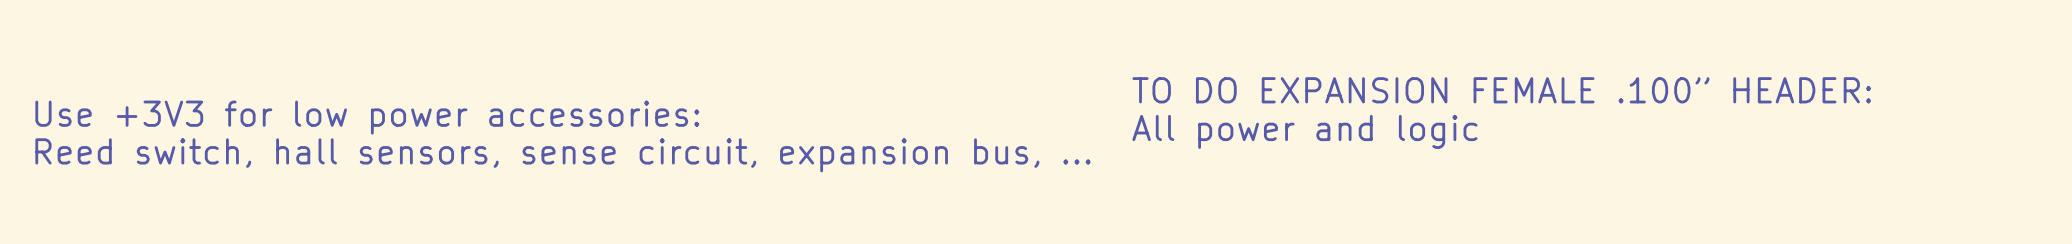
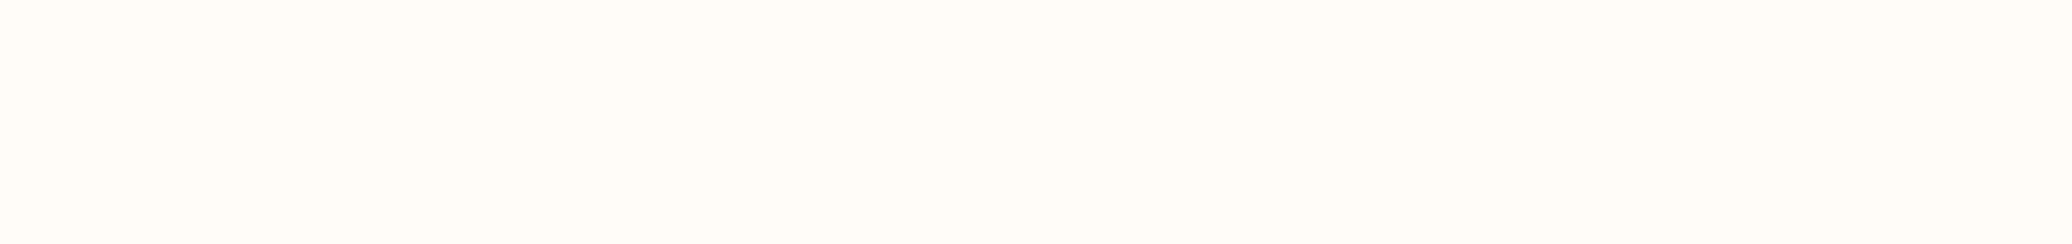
text: TO DO EXPANSION FEMALE .100” HEADER: (1501, 90) -> none
text: Use +3V3 for low power accessories: (367, 117) -> none
text: All power and logic (1304, 131) -> none
text: Reed switch, hall sensors, sense circuit, expansion bus, … (563, 155) -> none

